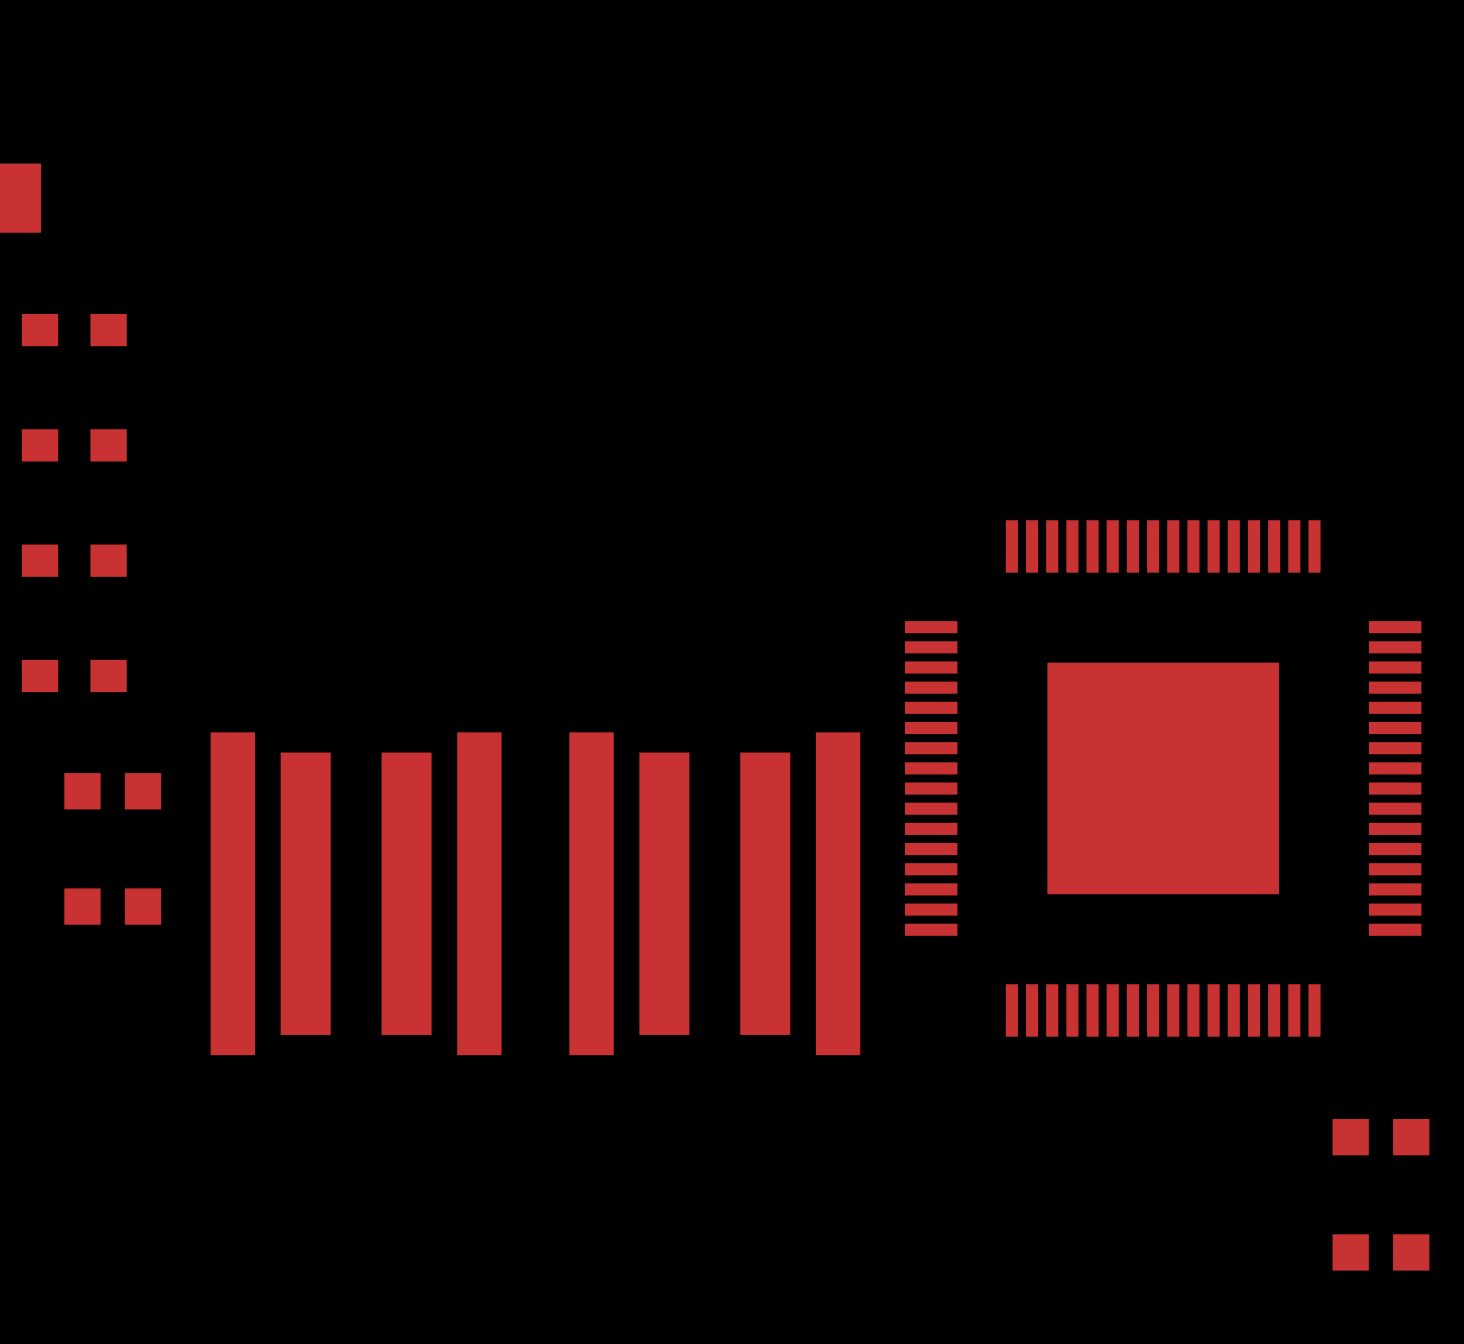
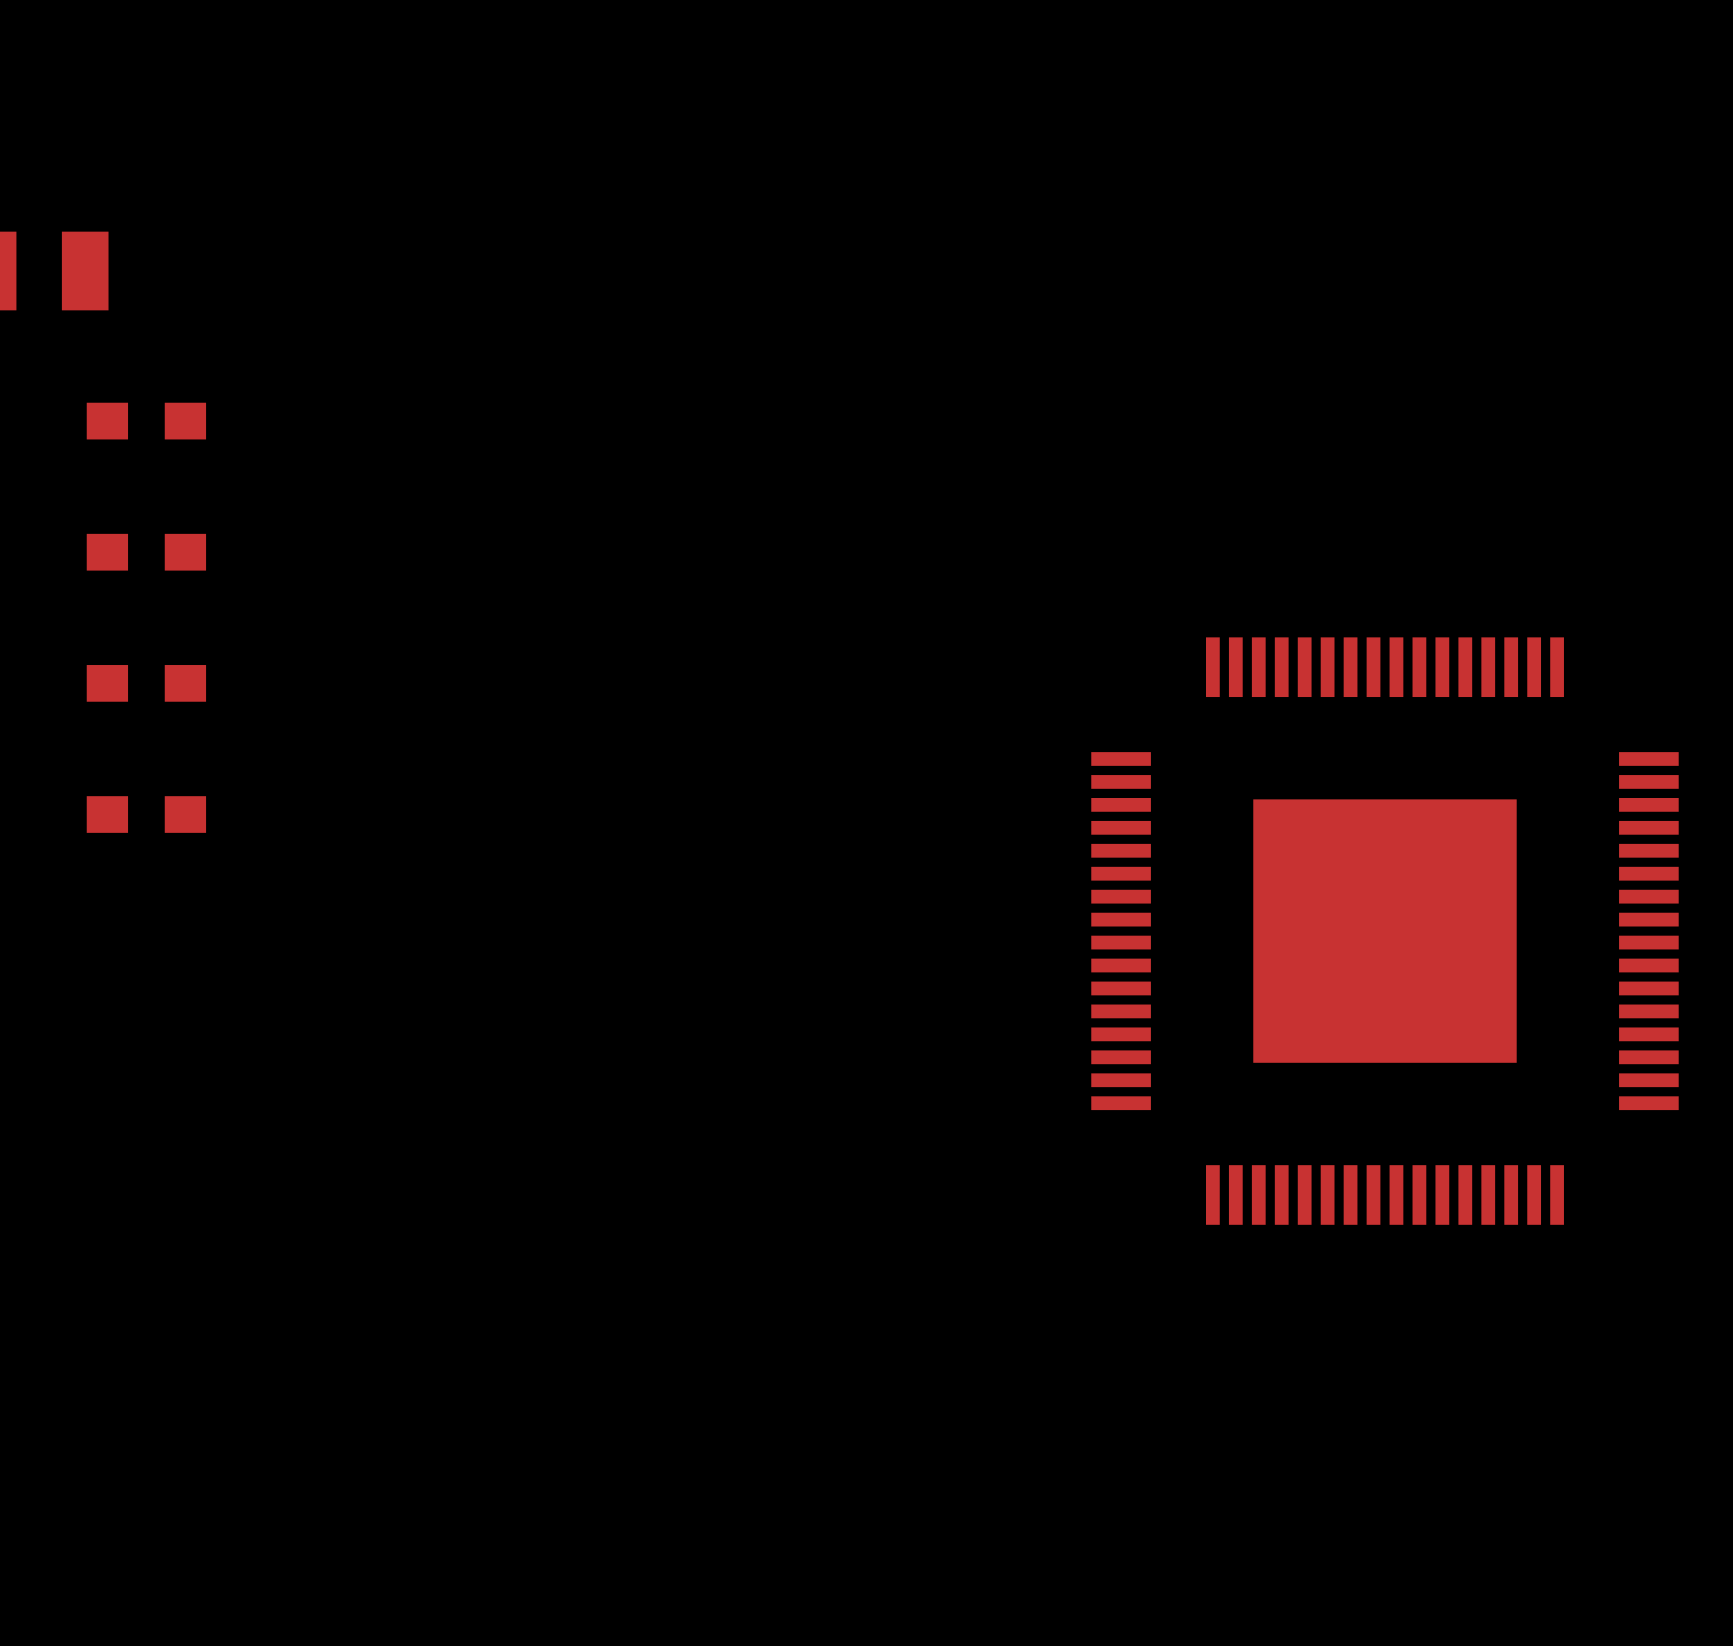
part: (112, 791) -> none
part: (356, 893) -> none
part: (714, 893) -> none
part: (112, 906) -> none
part: (1380, 1137) -> none
part: (1380, 1252) -> none

